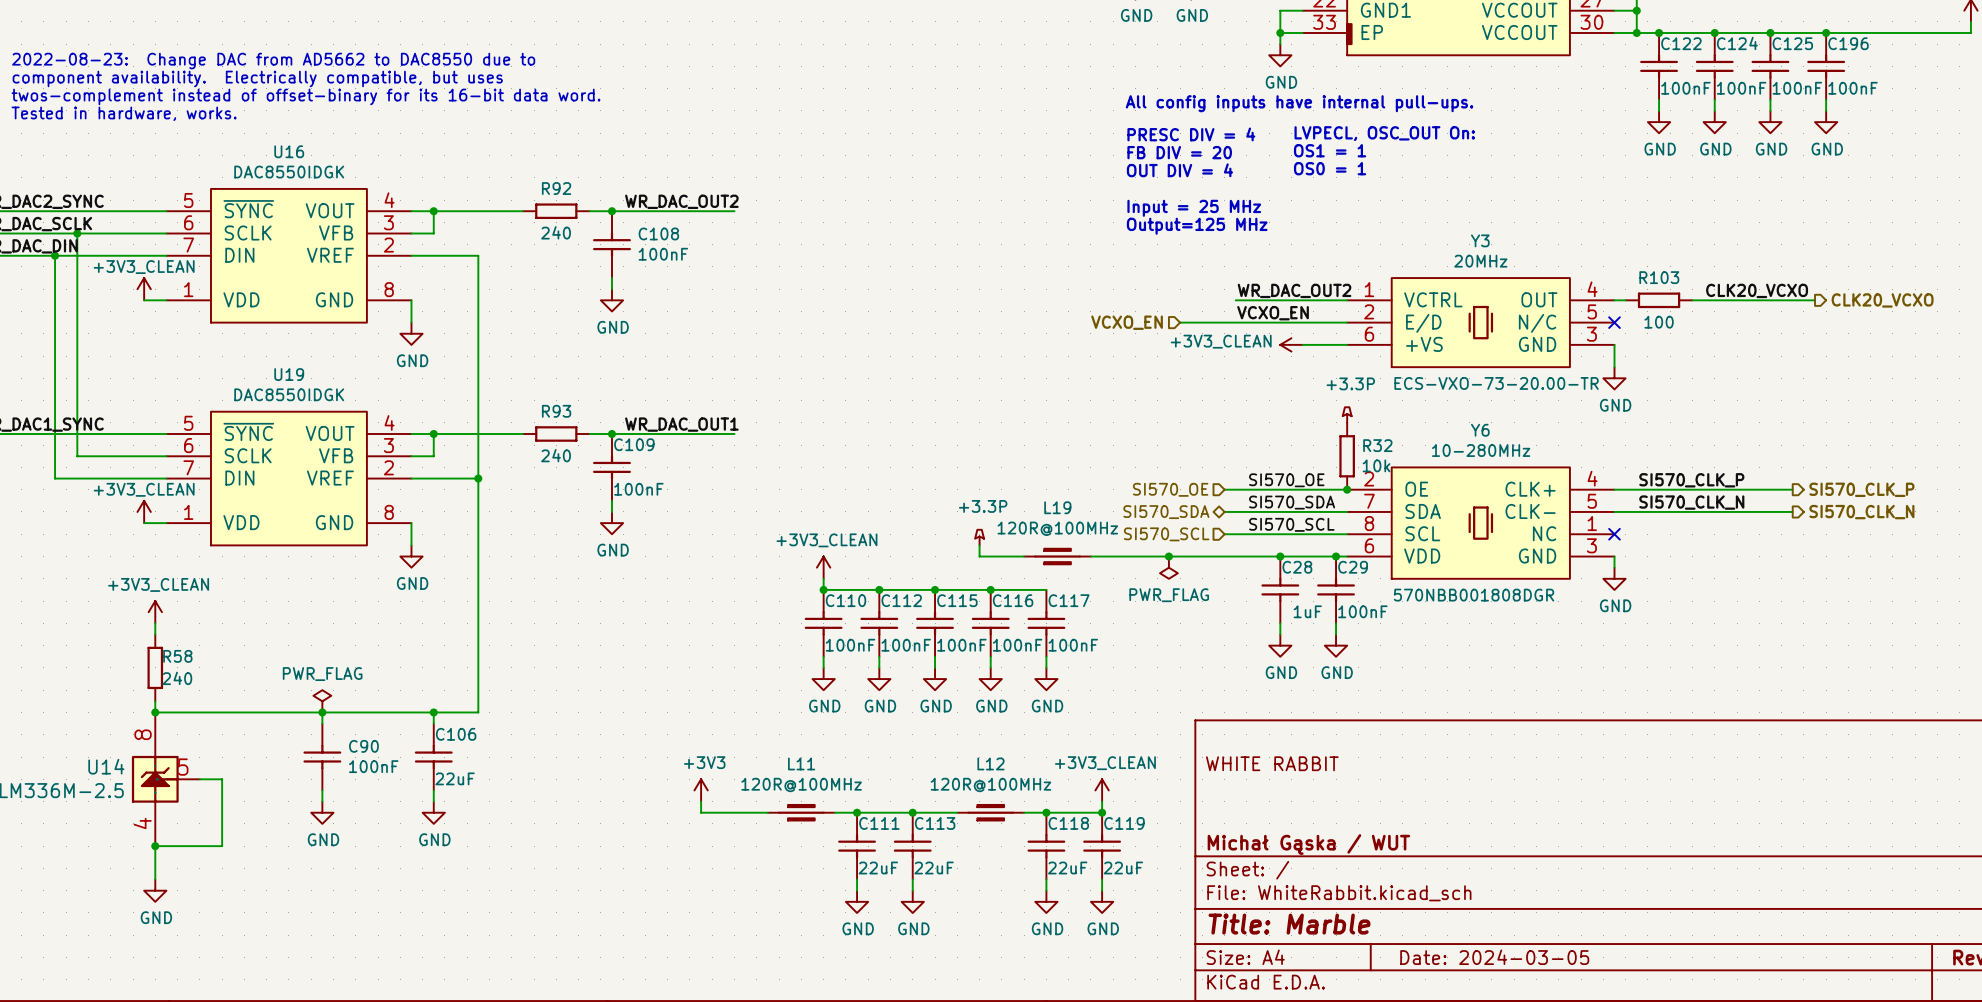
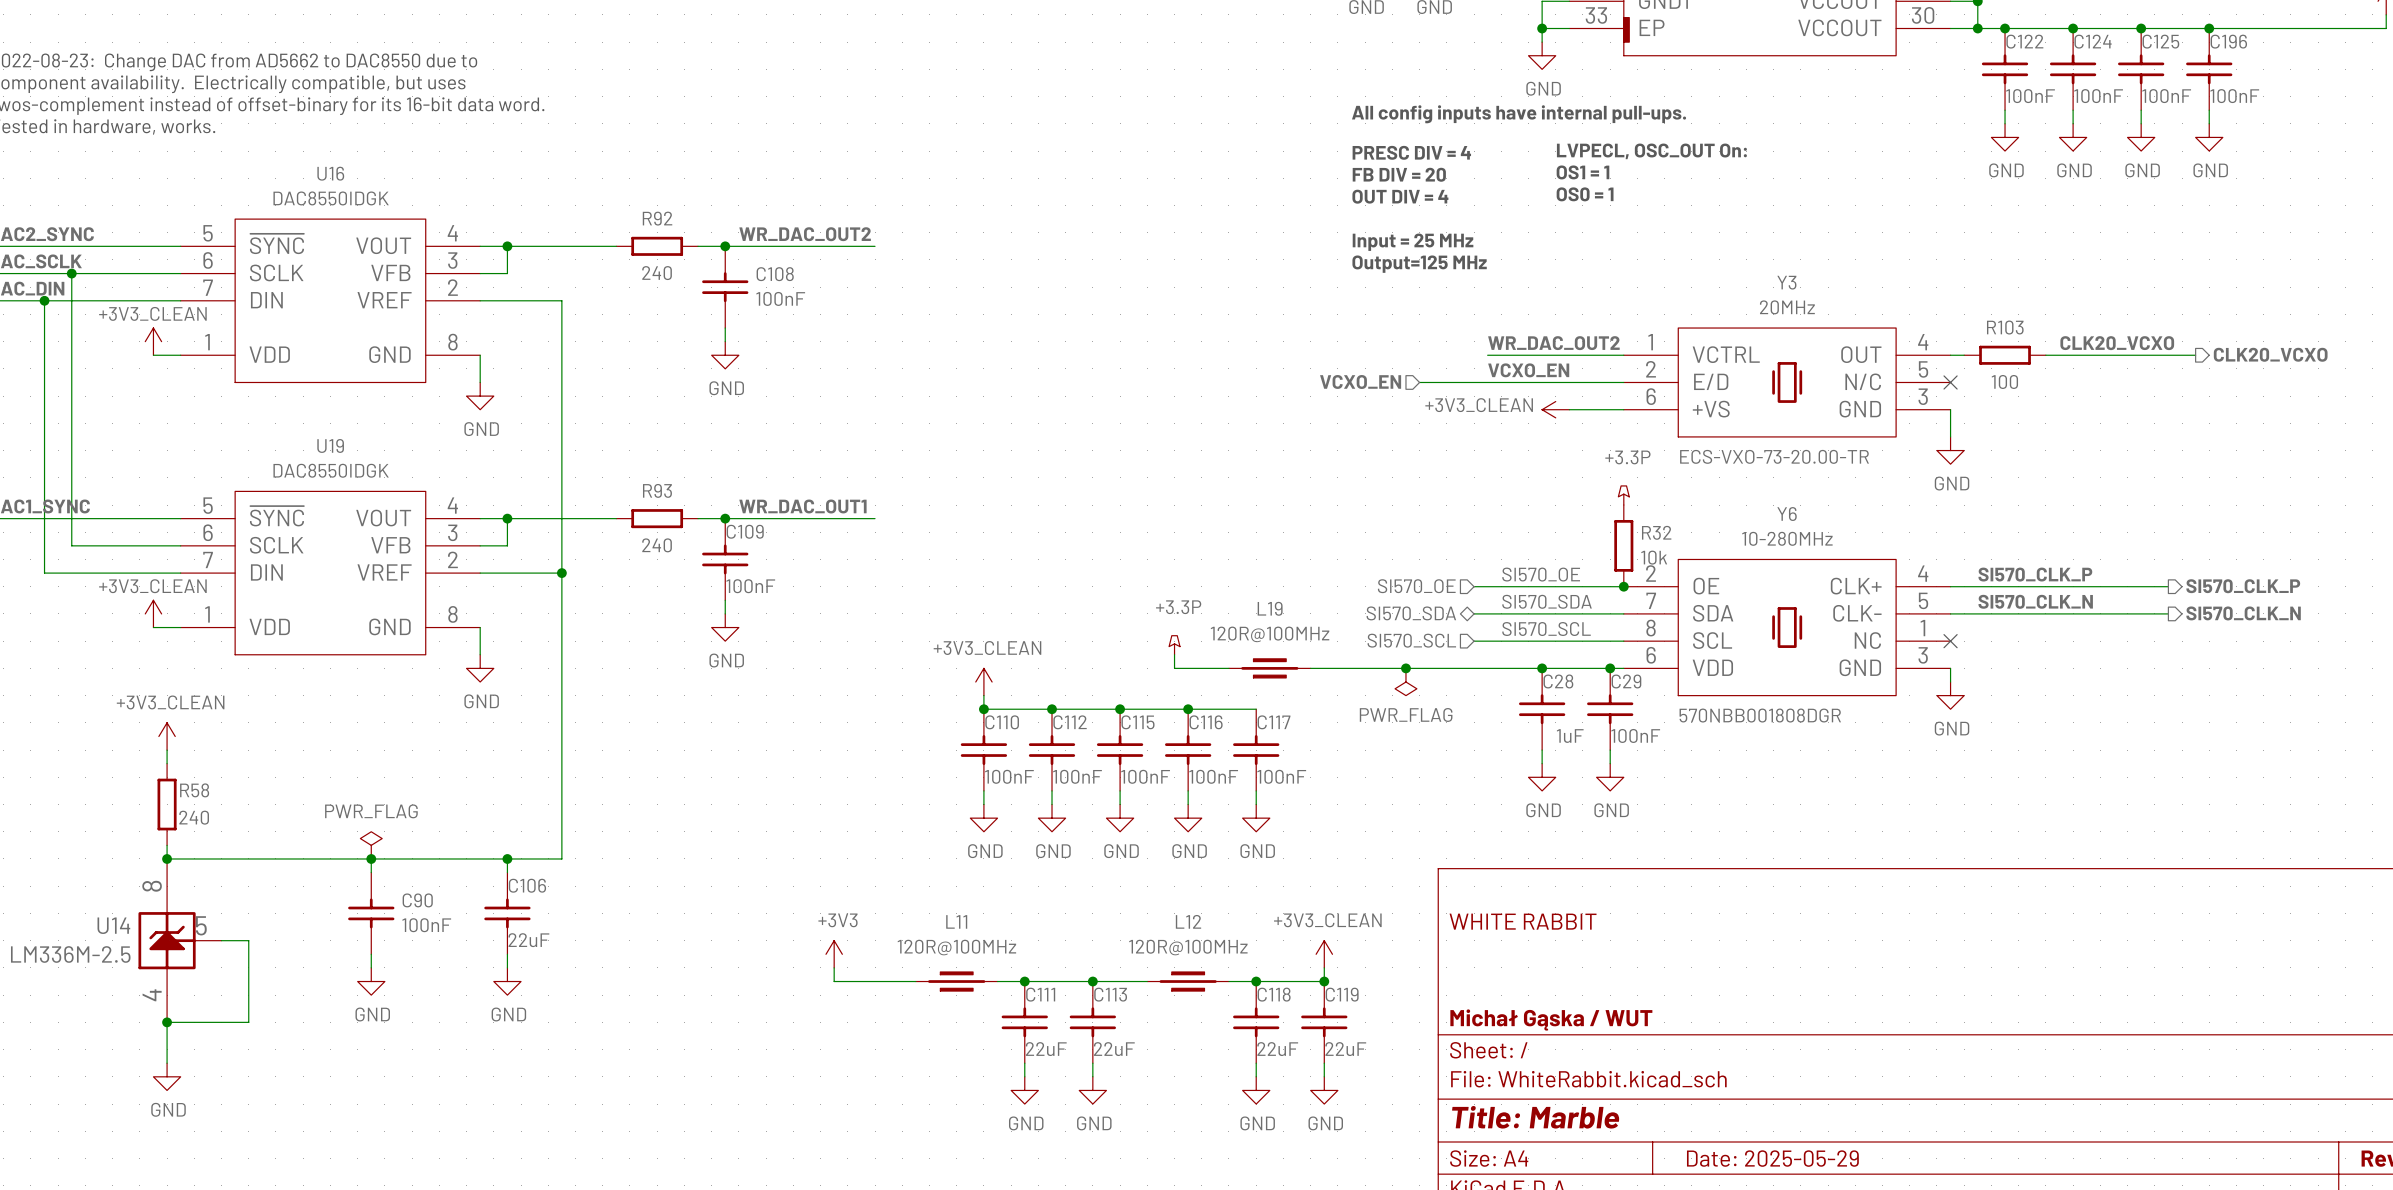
title block: Date: 2024-03-05 (1494, 957) -> Date: 2025-05-29 (1772, 1158)

